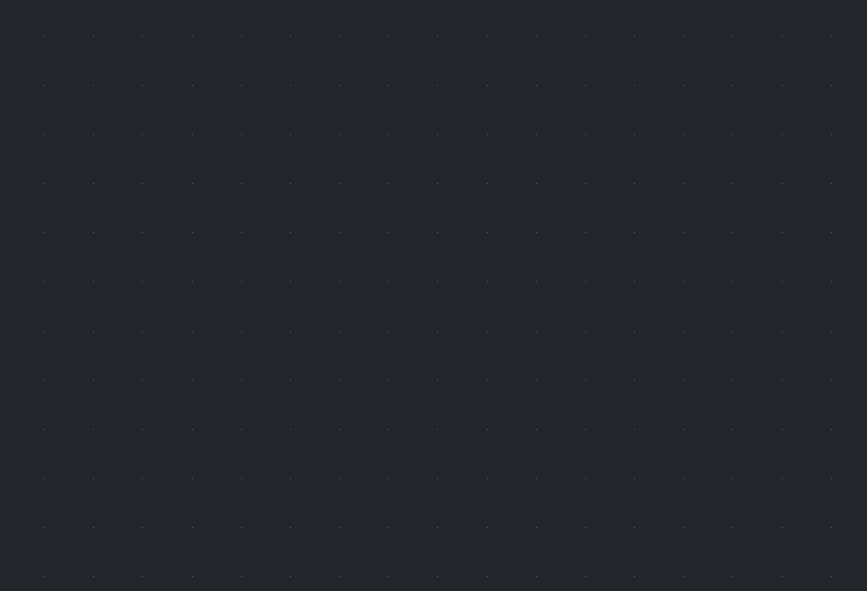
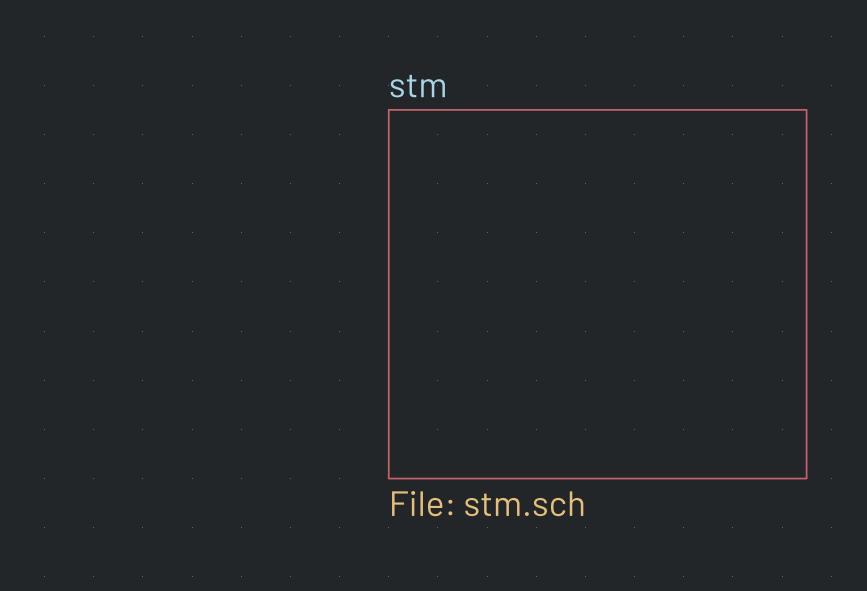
sheet stm: none -> File: stm.sch (597, 294)

